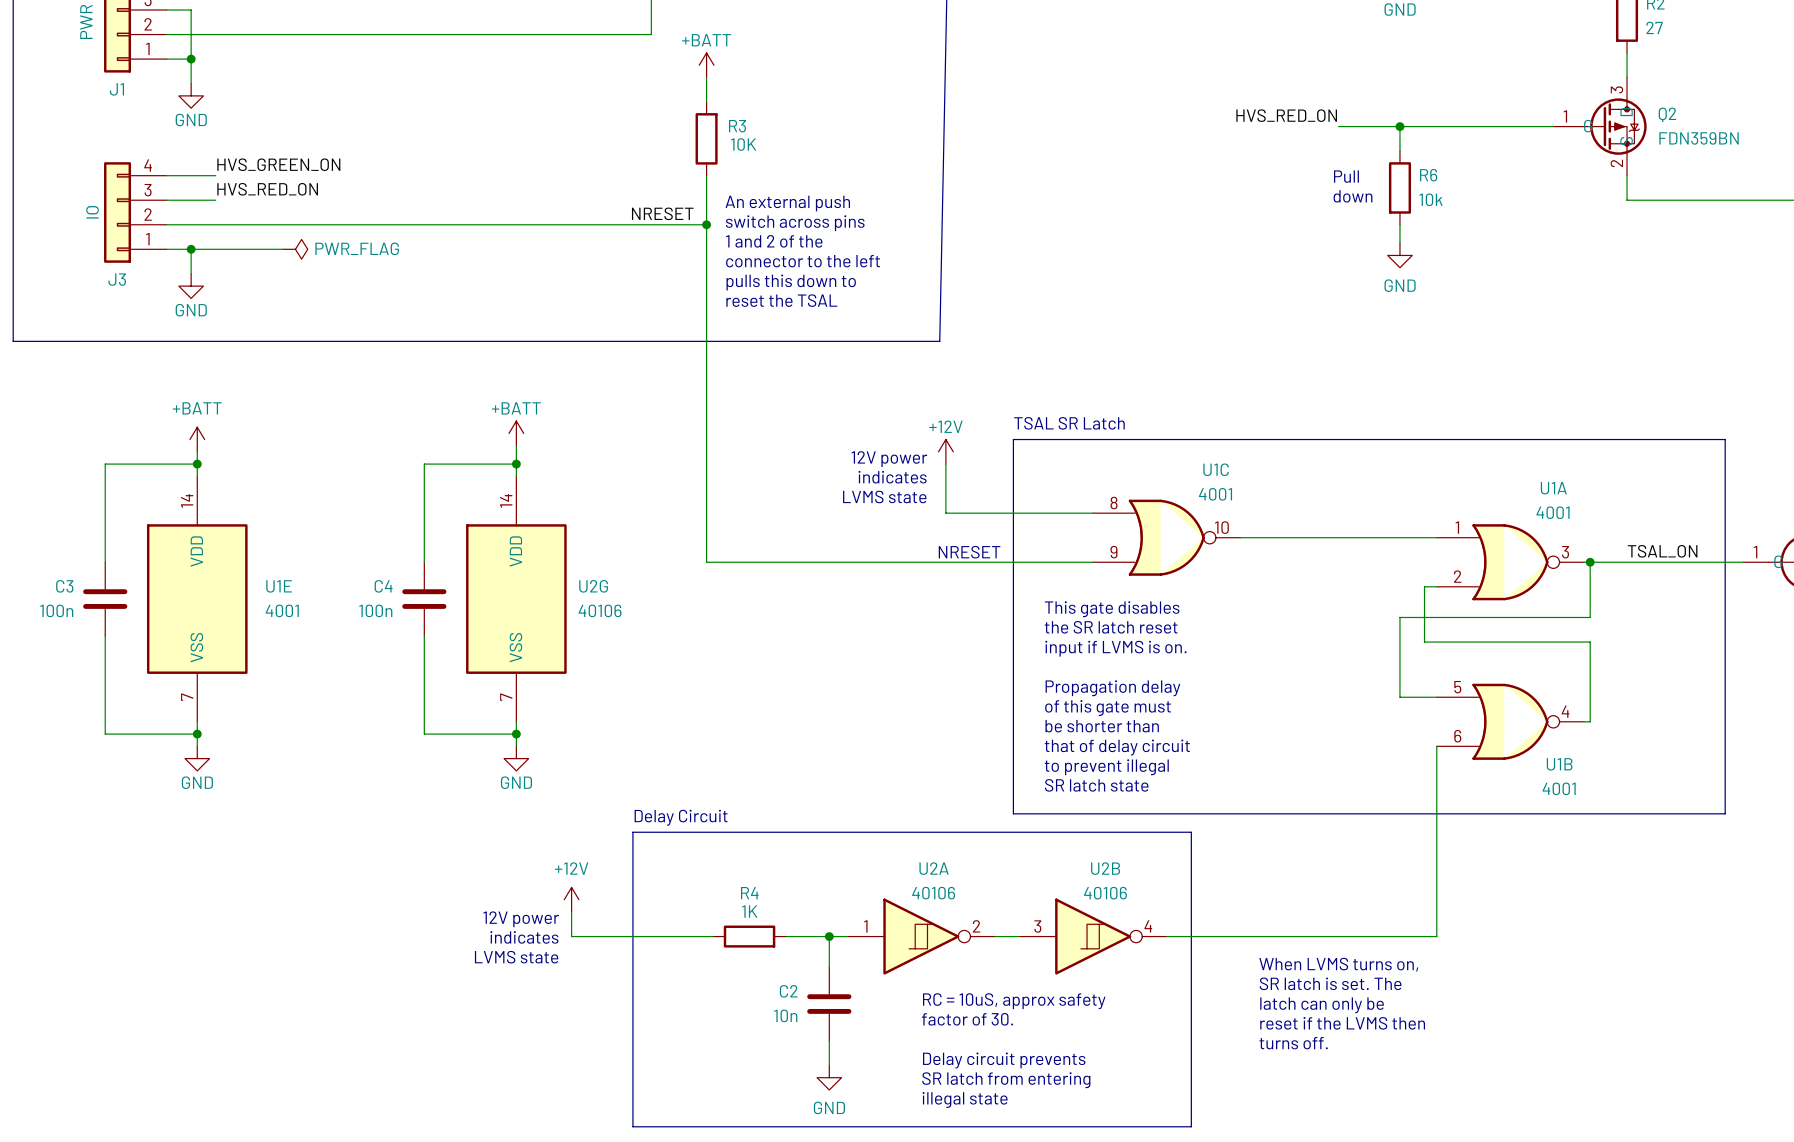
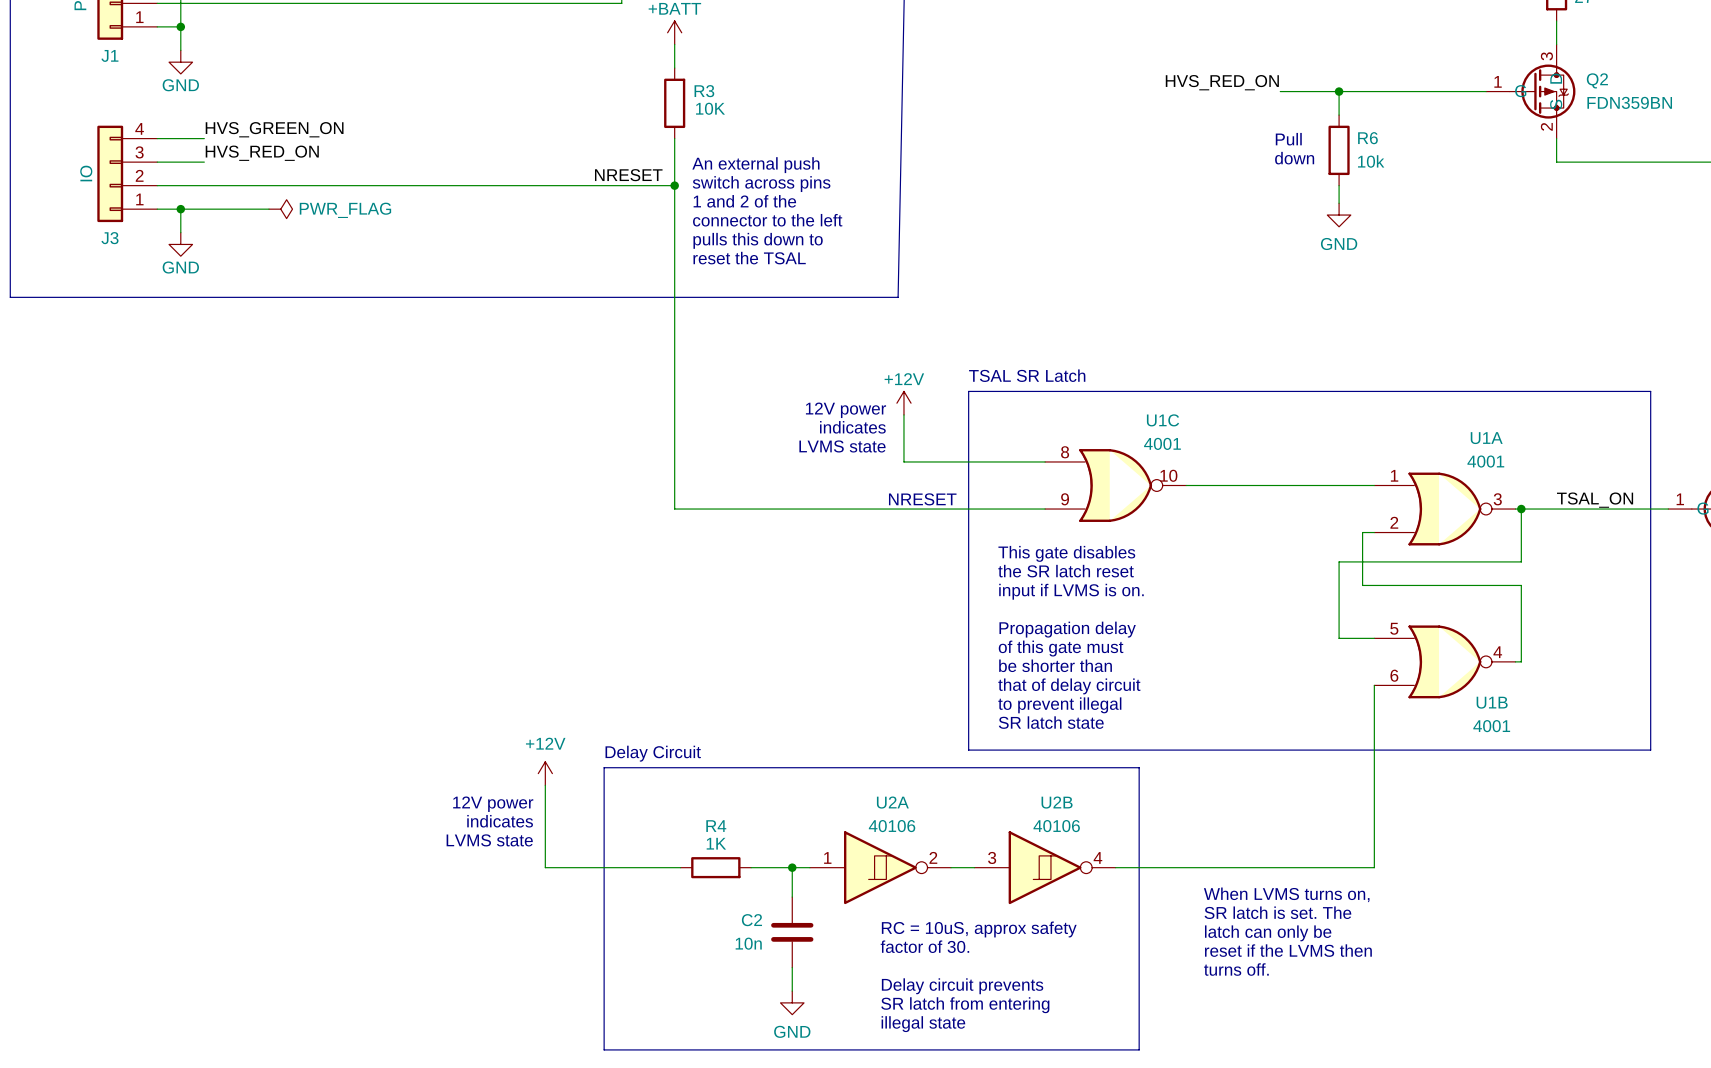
power symbol: +BATT (516, 433) -> none
power symbol: +BATT (197, 439) -> none
wire: (516, 445) (516, 476) -> none
wire: (197, 451) (197, 476) -> none
wire: (197, 464) (105, 464) (105, 562) -> none
junction: (197, 464) -> none
wire: (516, 464) (424, 464) (424, 562) -> none
junction: (516, 464) -> none
C3: 100n (105, 599) -> none
U1E: 4001 (197, 599) -> none
C4: 100n (424, 599) -> none
U2G: 40106 (516, 599) -> none
wire: (105, 635) (105, 734) (197, 734) -> none
wire: (424, 635) (424, 734) (516, 734) -> none
wire: (197, 721) (197, 746) -> none
wire: (516, 721) (516, 746) -> none
junction: (197, 734) -> none
junction: (516, 734) -> none
power symbol: GND (197, 758) -> none
power symbol: GND (516, 758) -> none
wire: none -> (545, 785) (545, 844)
power symbol position: +12V (571, 899) -> +12V (545, 773)
text position: 12V power (521, 919) -> 12V power (493, 804)
text position: indicates (524, 937) -> indicates (500, 821)
text position: LVMS state (516, 957) -> LVMS state (489, 840)

